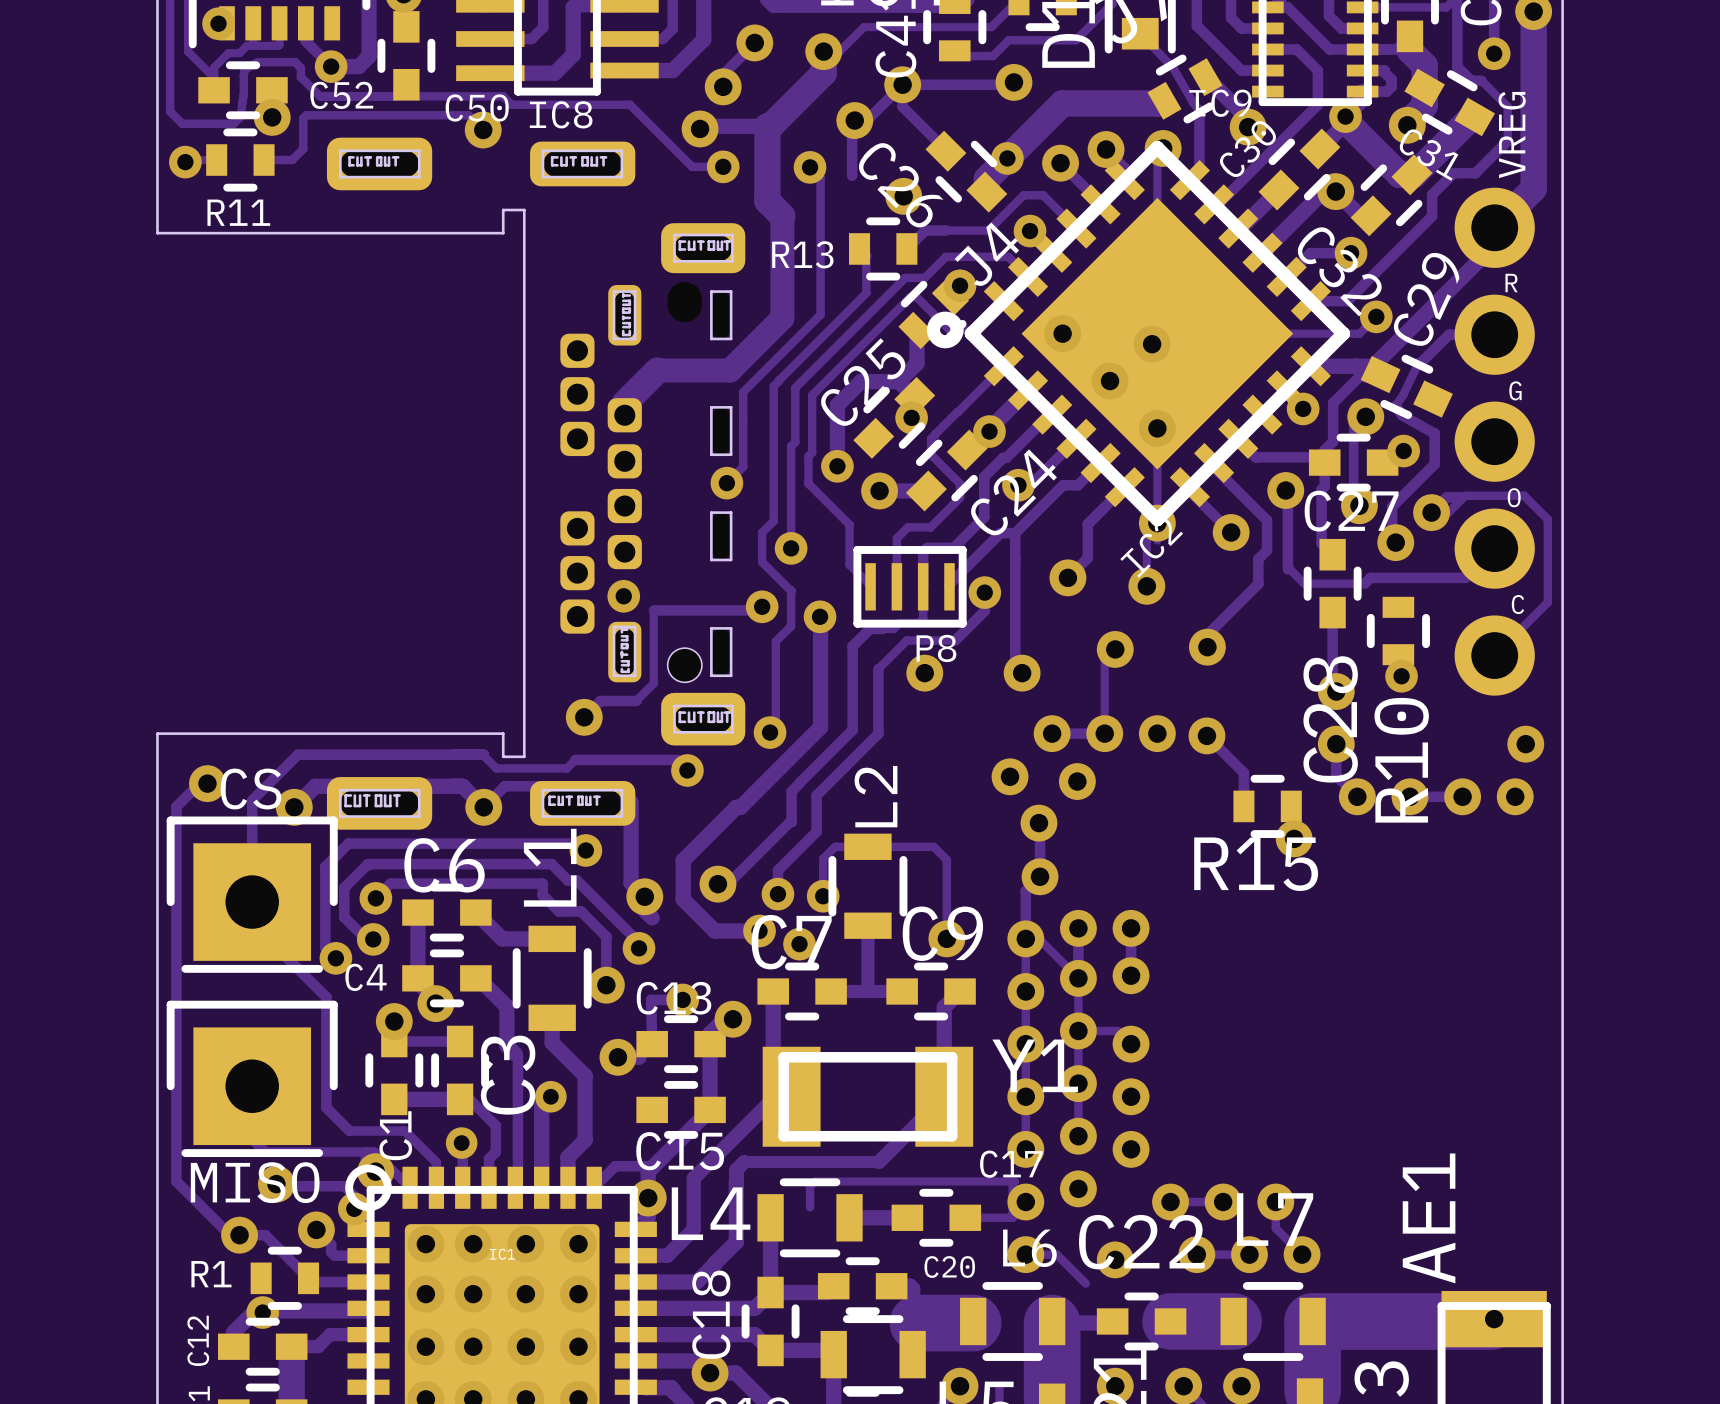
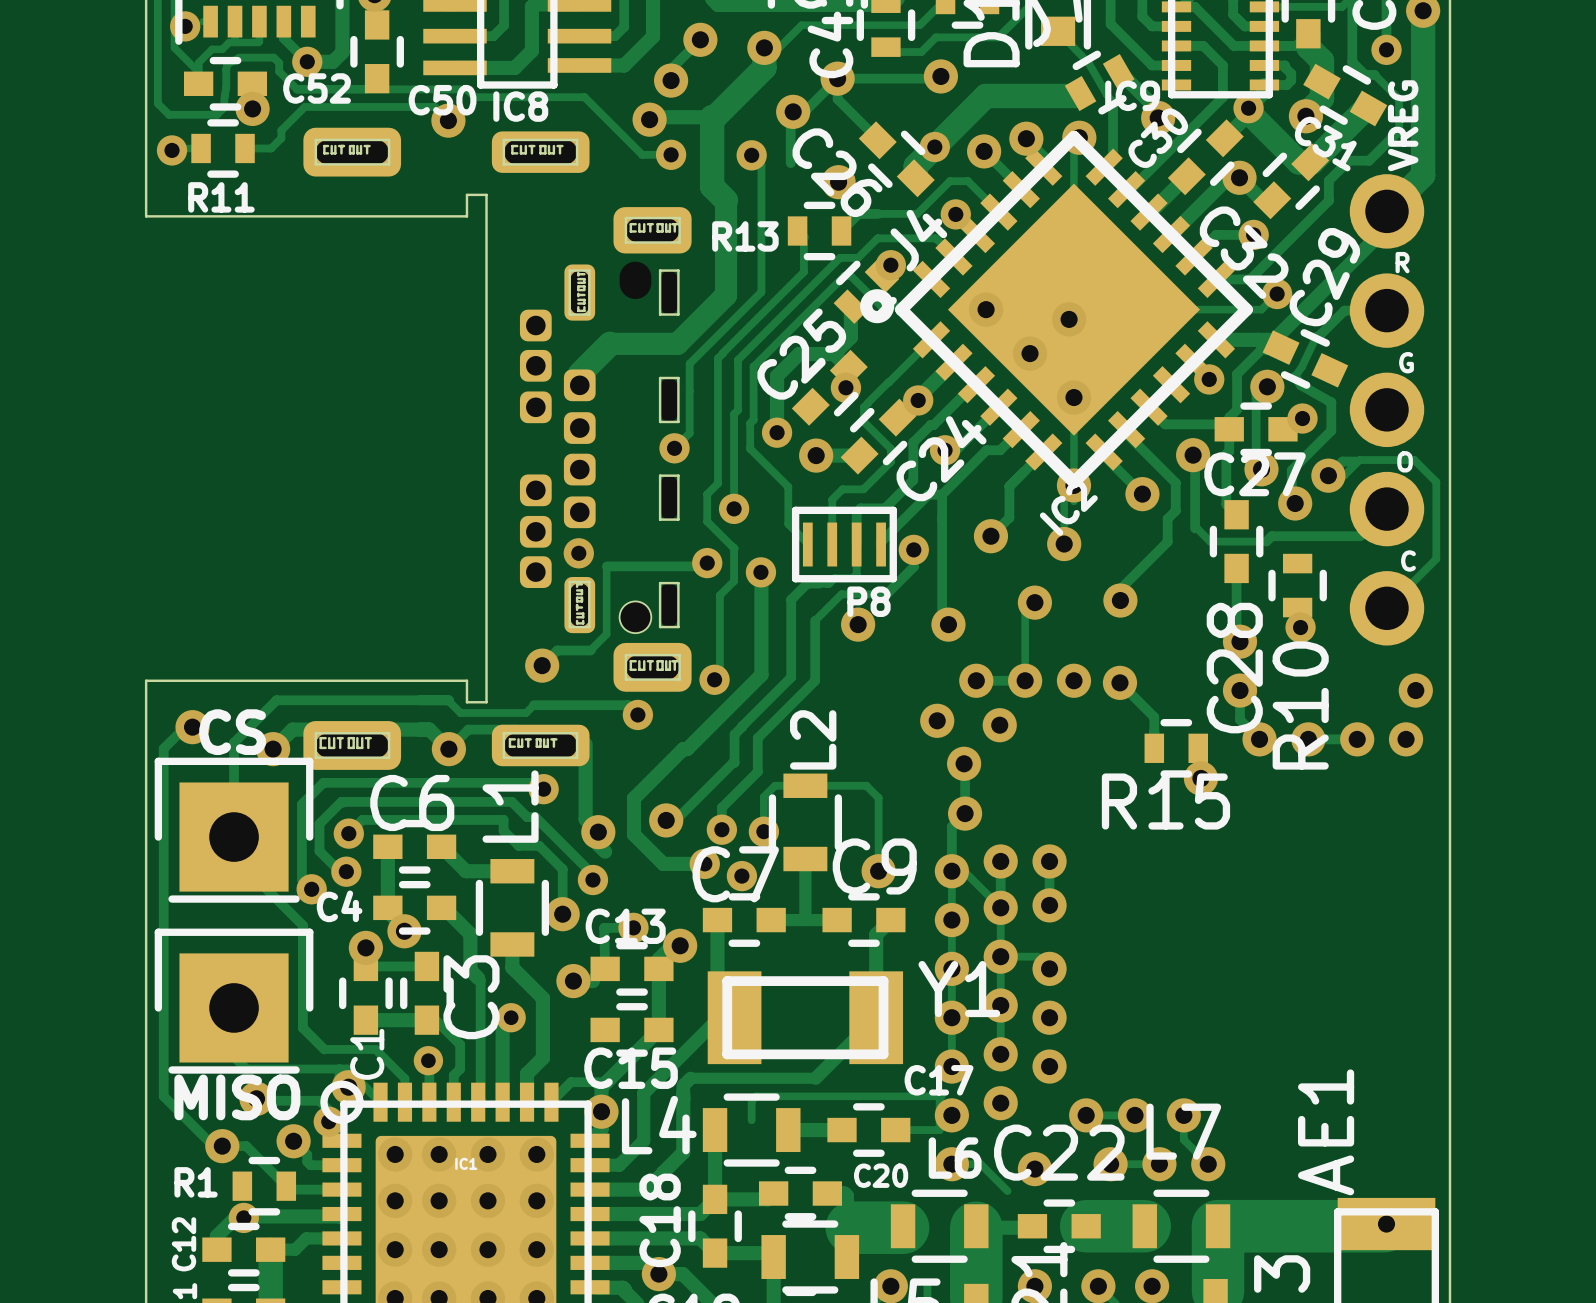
via position: (218, 23) -> (185, 26)
track: (328, 115) (306, 115) (303, 118) (303, 140) -> (304, 106) (281, 130)

